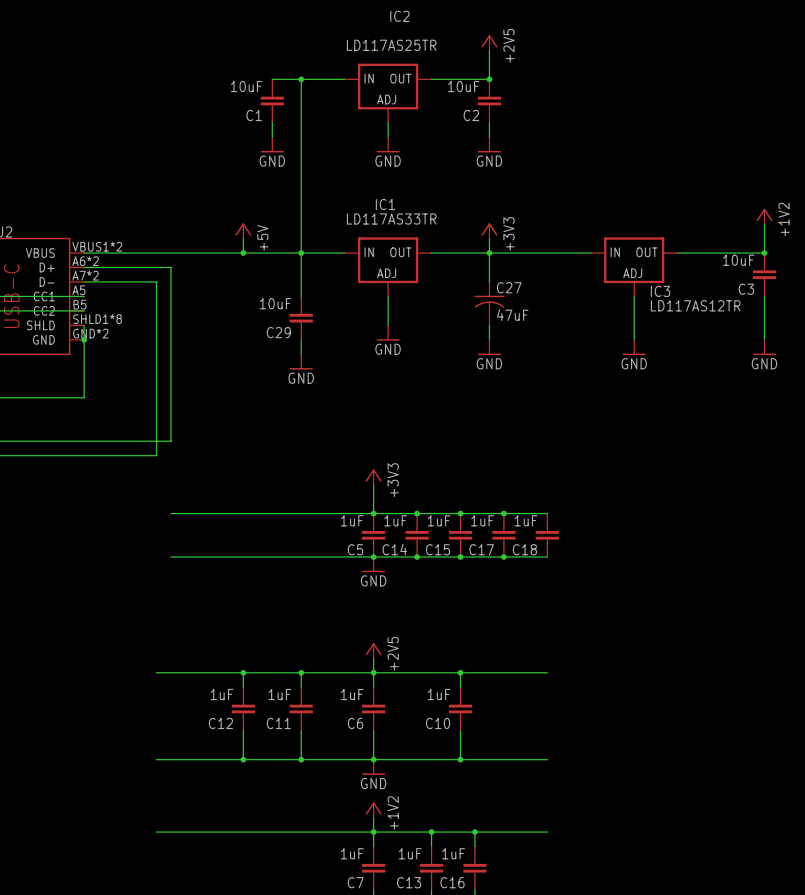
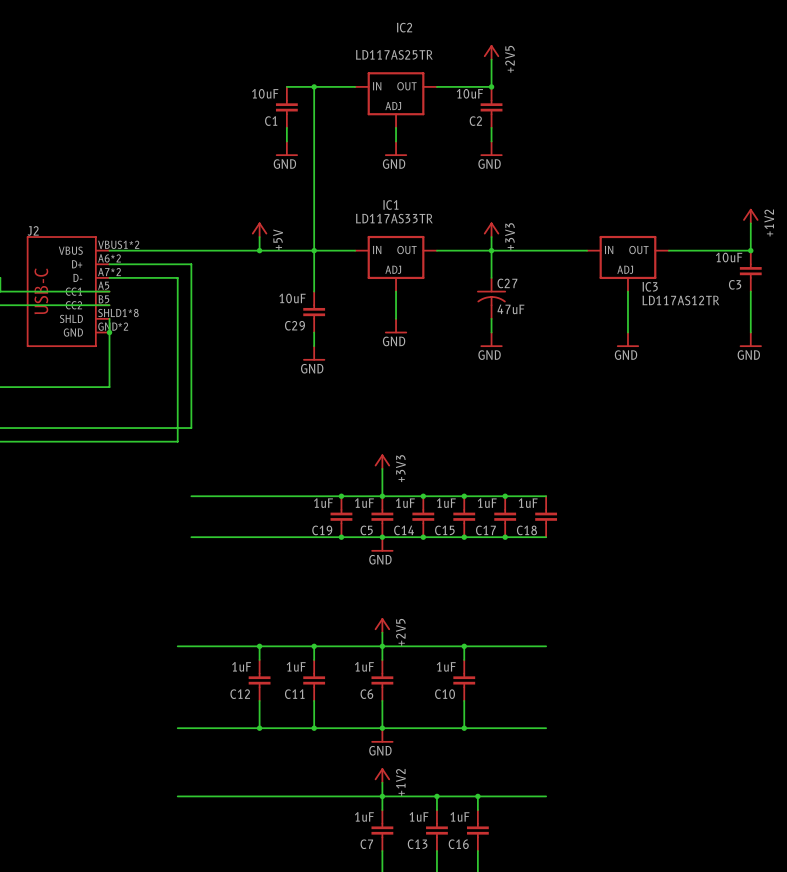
junction: none -> (341, 496)
C19: none -> 1uF (341, 516)
junction: none -> (341, 537)

